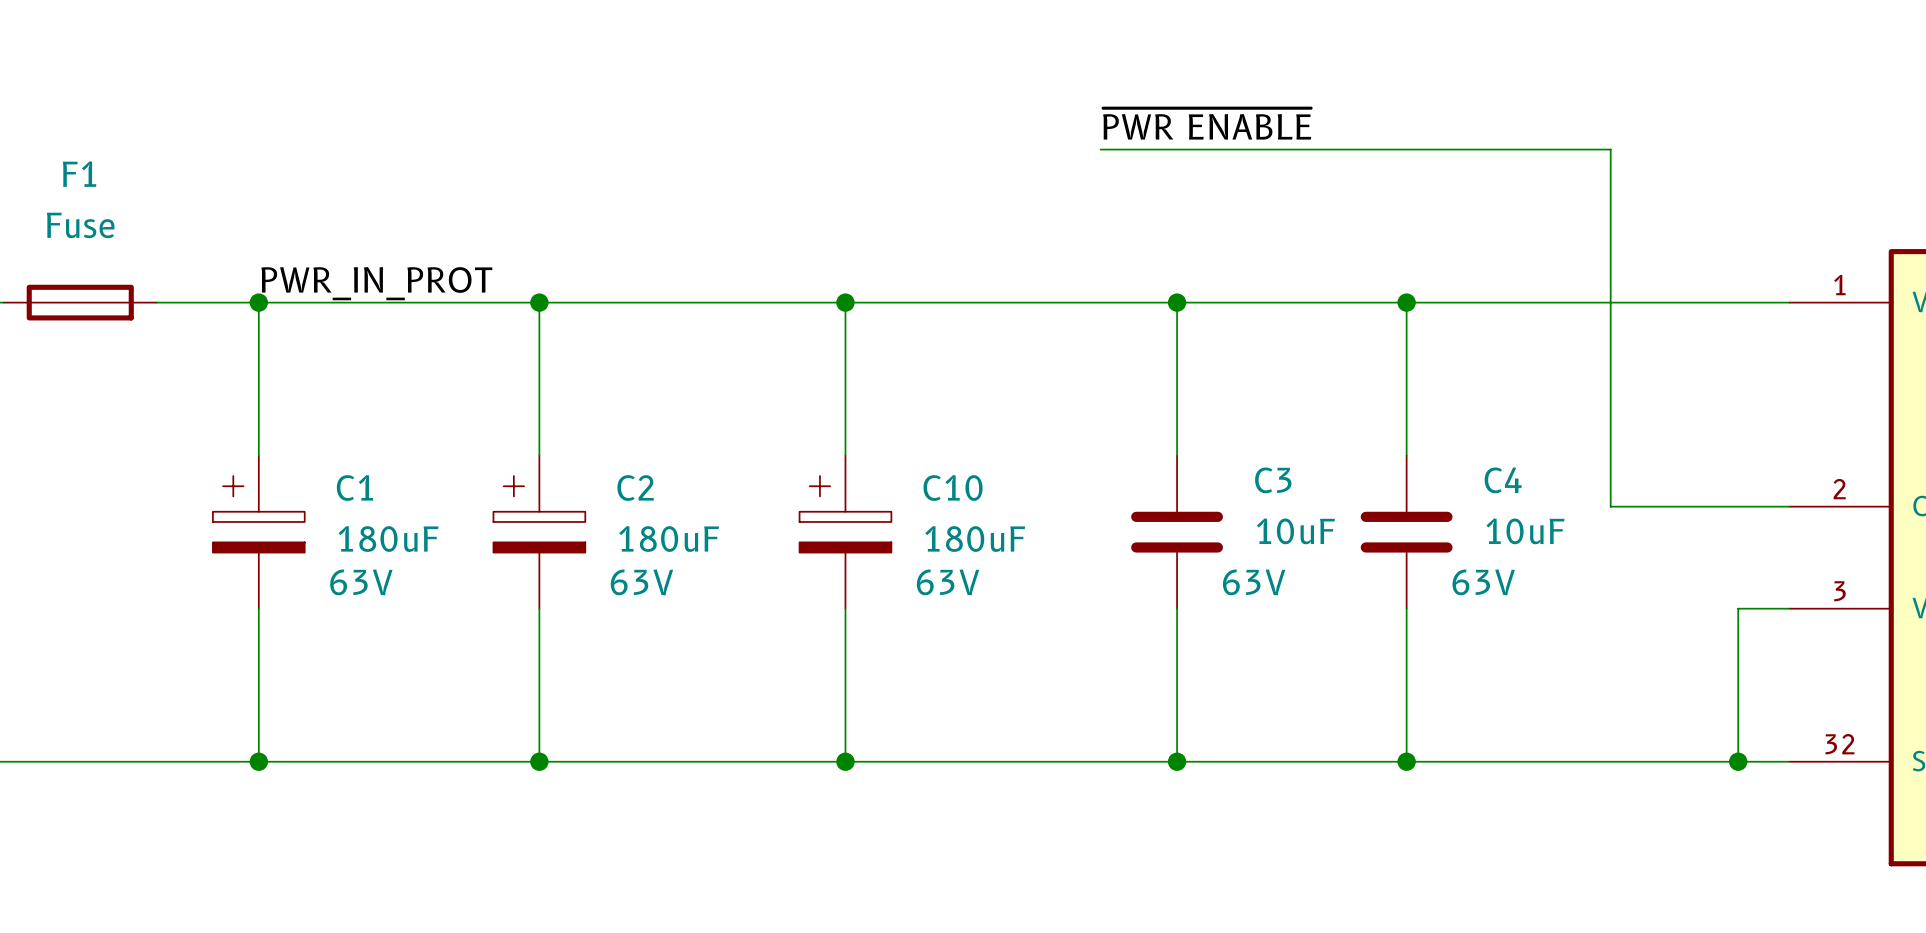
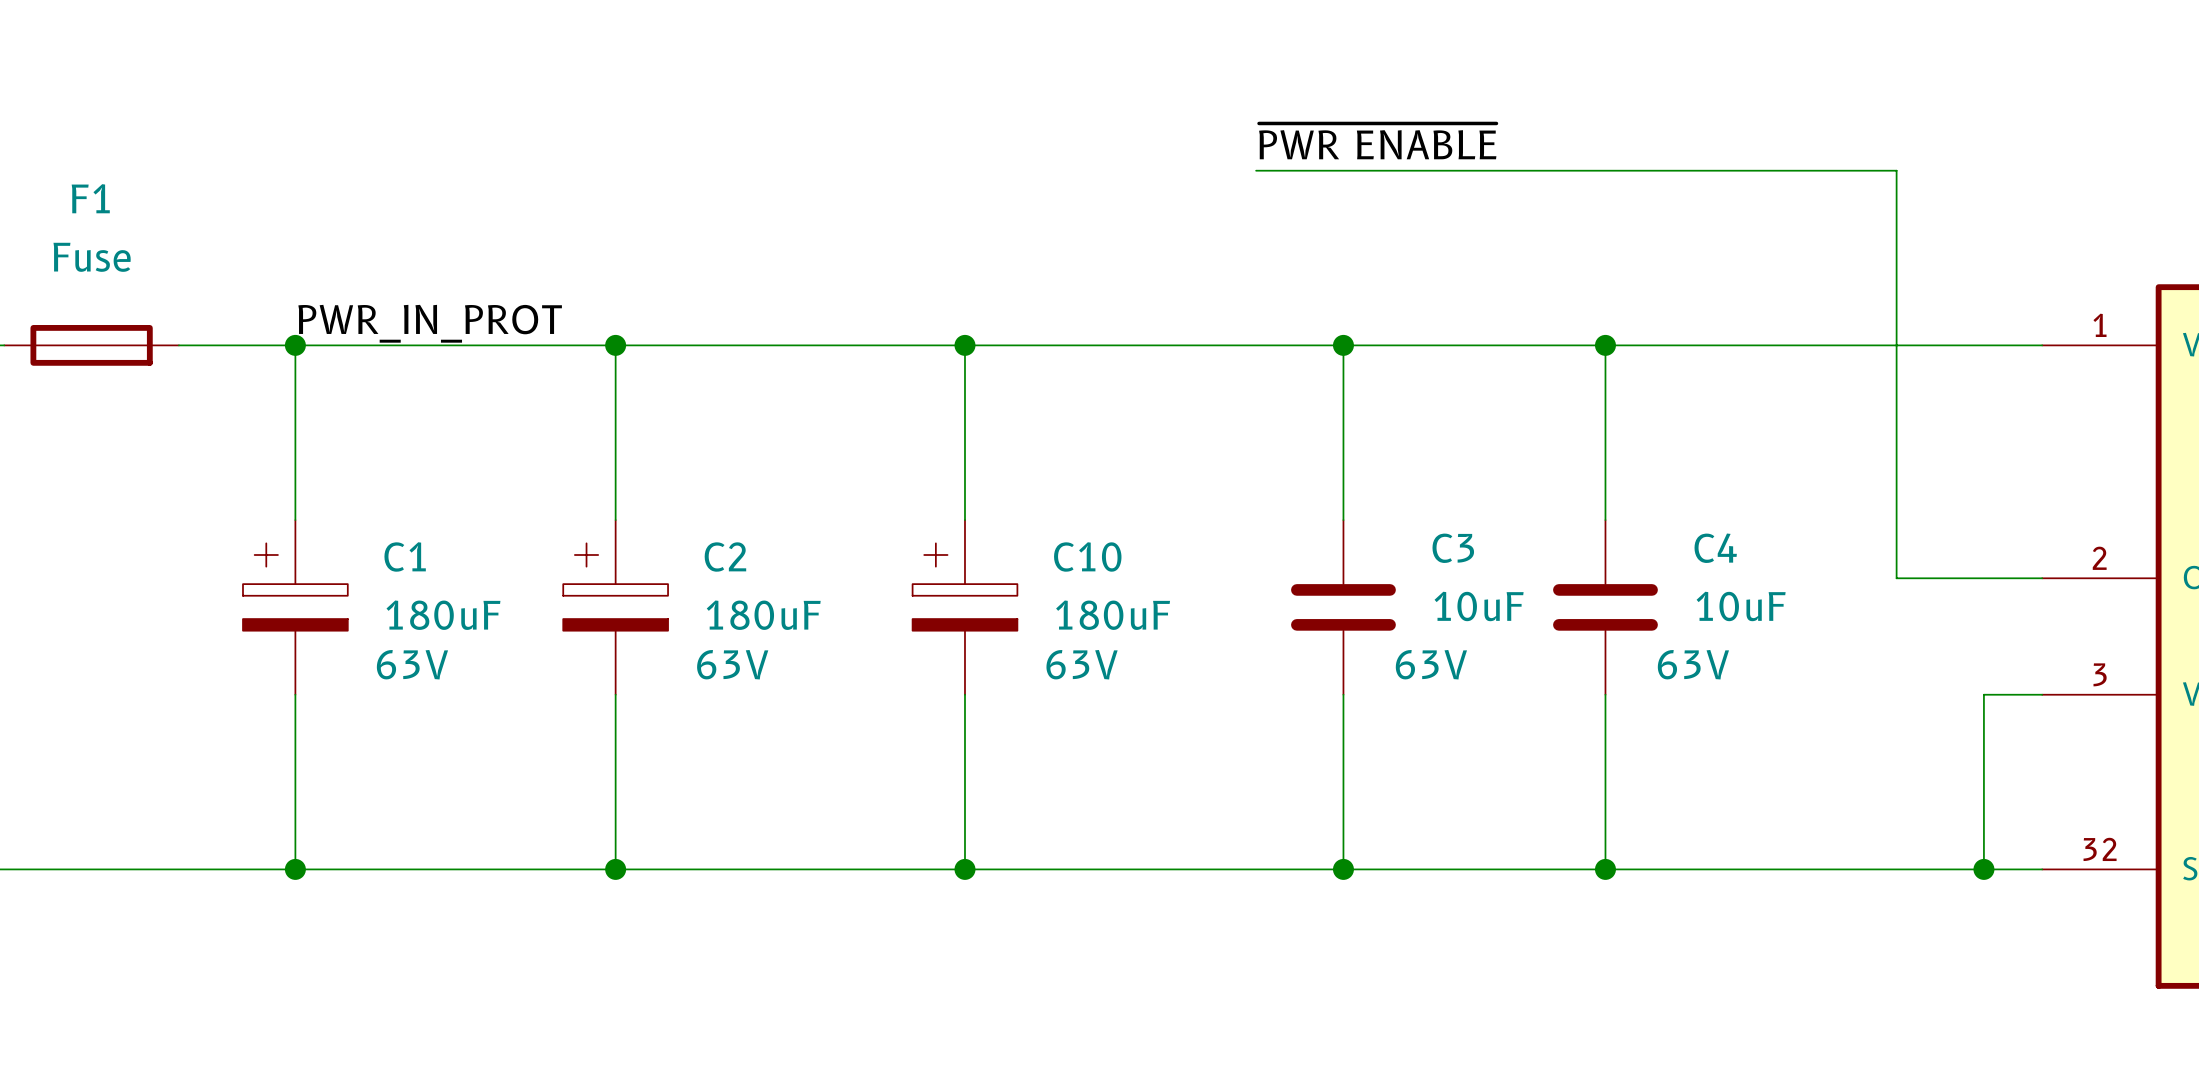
wire: (1610, 149) (1610, 506) (1661, 506) -> (1838, 170) (1896, 170) (1896, 578)

